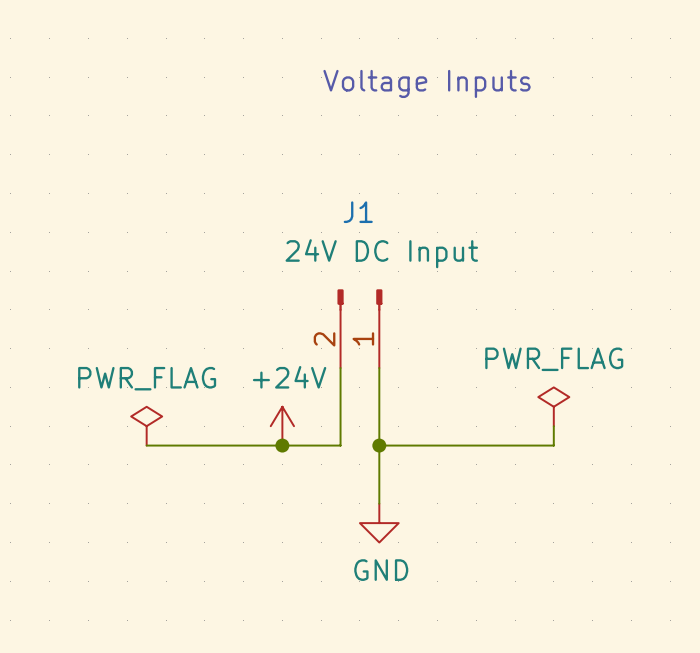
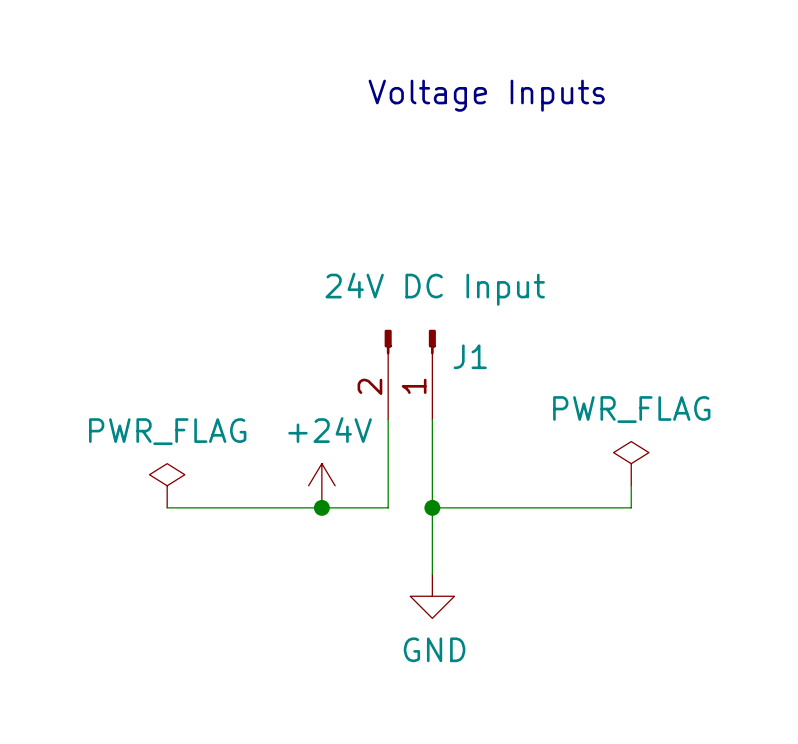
J1 name position: J1 (358, 212) -> J1 (470, 356)

